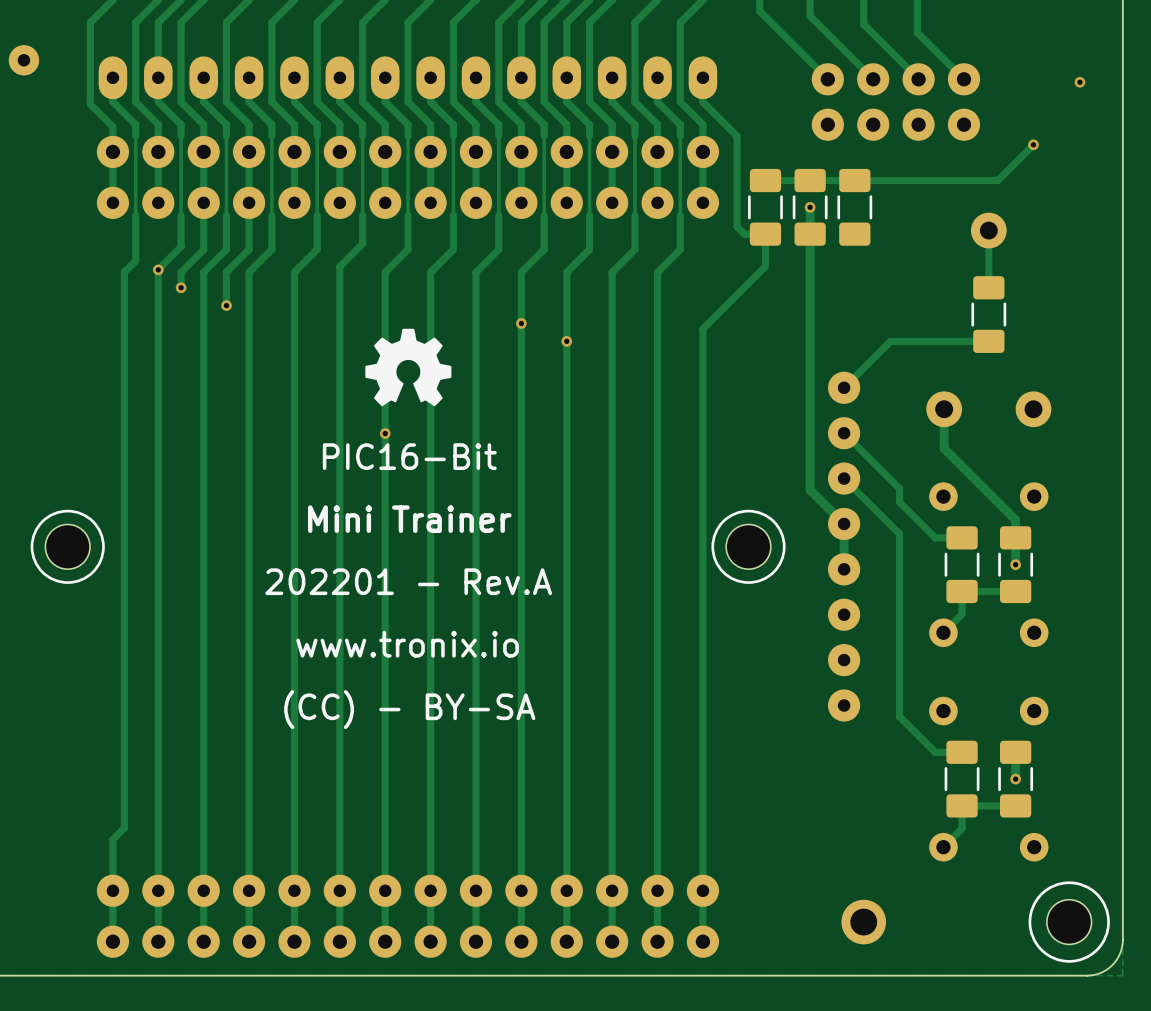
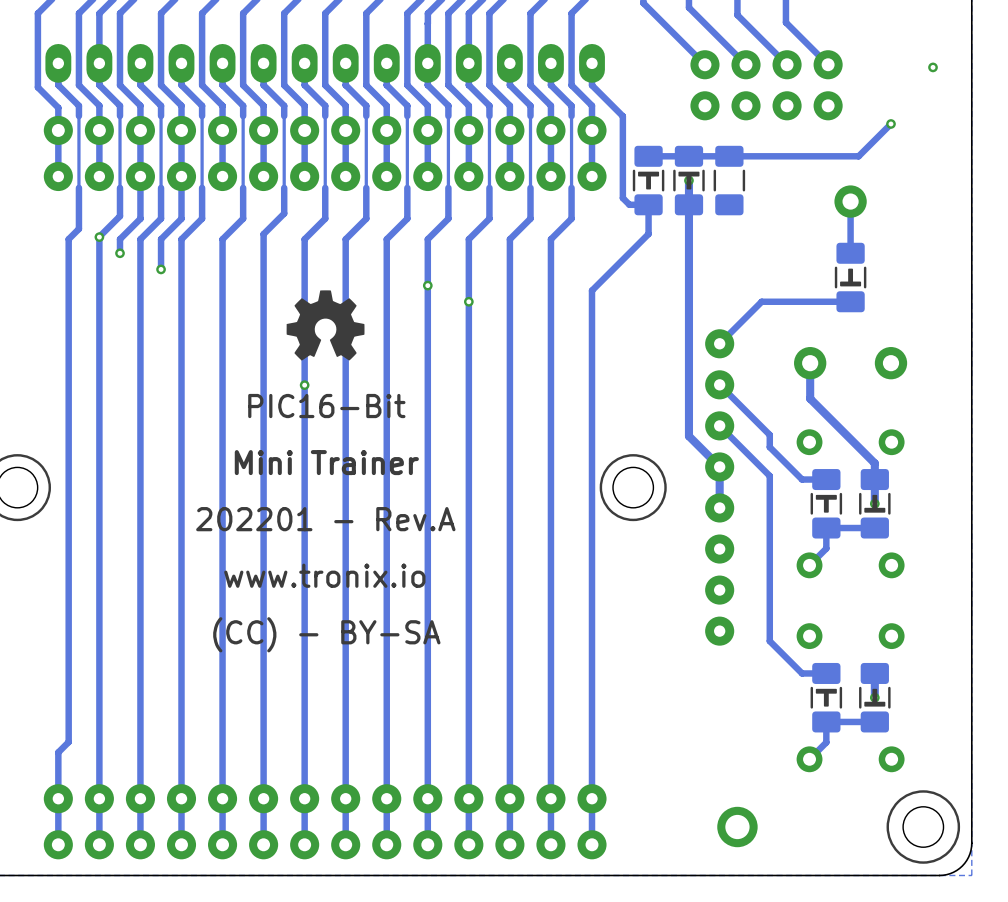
part footprint: [748, 168, 783, 246] -> [632, 145, 665, 216]
part footprint: [792, 168, 828, 246] -> [673, 145, 705, 216]
part footprint: [971, 276, 1007, 353] -> [834, 242, 867, 313]
part footprint: [944, 526, 980, 604] -> [810, 469, 843, 539]
part footprint: [998, 526, 1034, 604] -> [859, 469, 891, 539]
part footprint: [944, 740, 980, 818] -> [810, 662, 843, 733]
part footprint: [998, 740, 1034, 818] -> [859, 662, 891, 733]

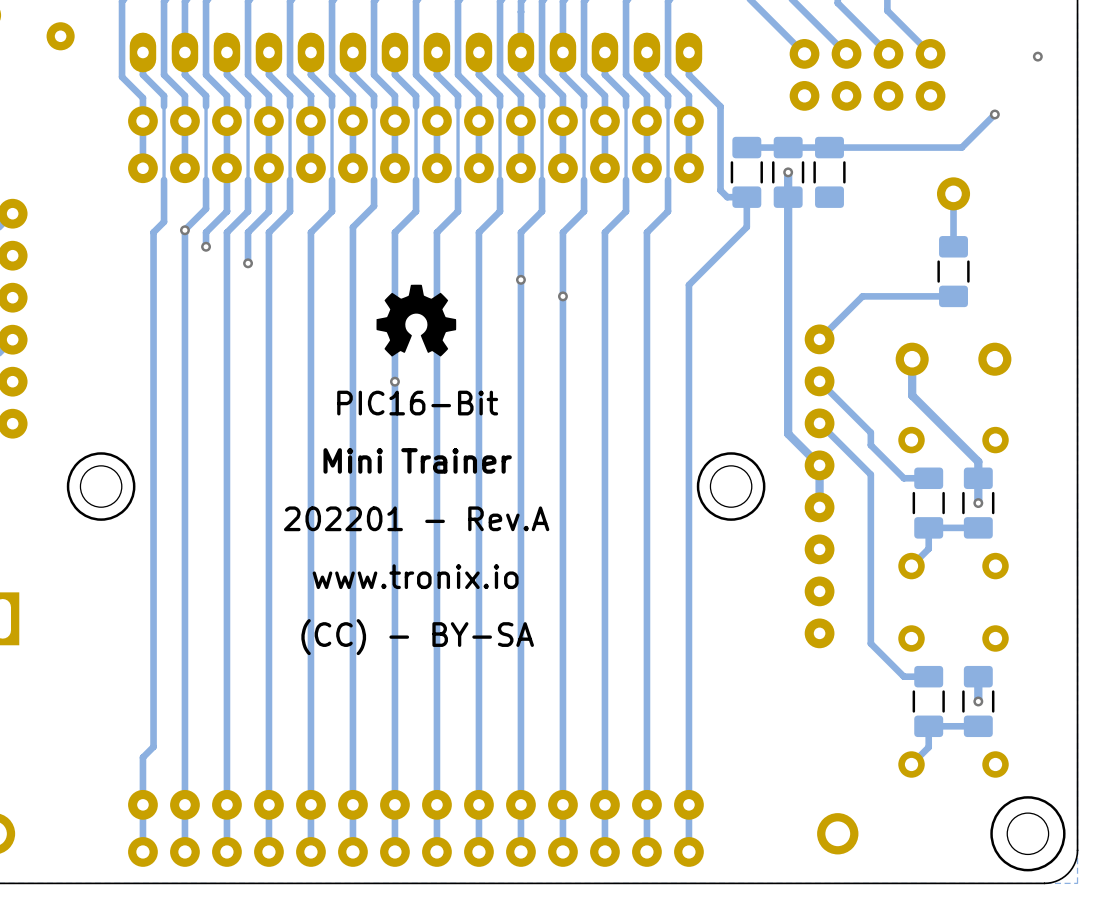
part footprint: [632, 145, 665, 216] -> [730, 136, 763, 208]
part footprint: [673, 145, 705, 216] -> [772, 136, 805, 208]
part footprint: [834, 242, 867, 313] -> [937, 236, 970, 308]
part footprint: [810, 469, 843, 539] -> [912, 467, 945, 539]
part footprint: [859, 469, 891, 539] -> [962, 467, 995, 539]
part footprint: [810, 662, 843, 733] -> [912, 665, 945, 738]
part footprint: [859, 662, 891, 733] -> [962, 665, 995, 738]

